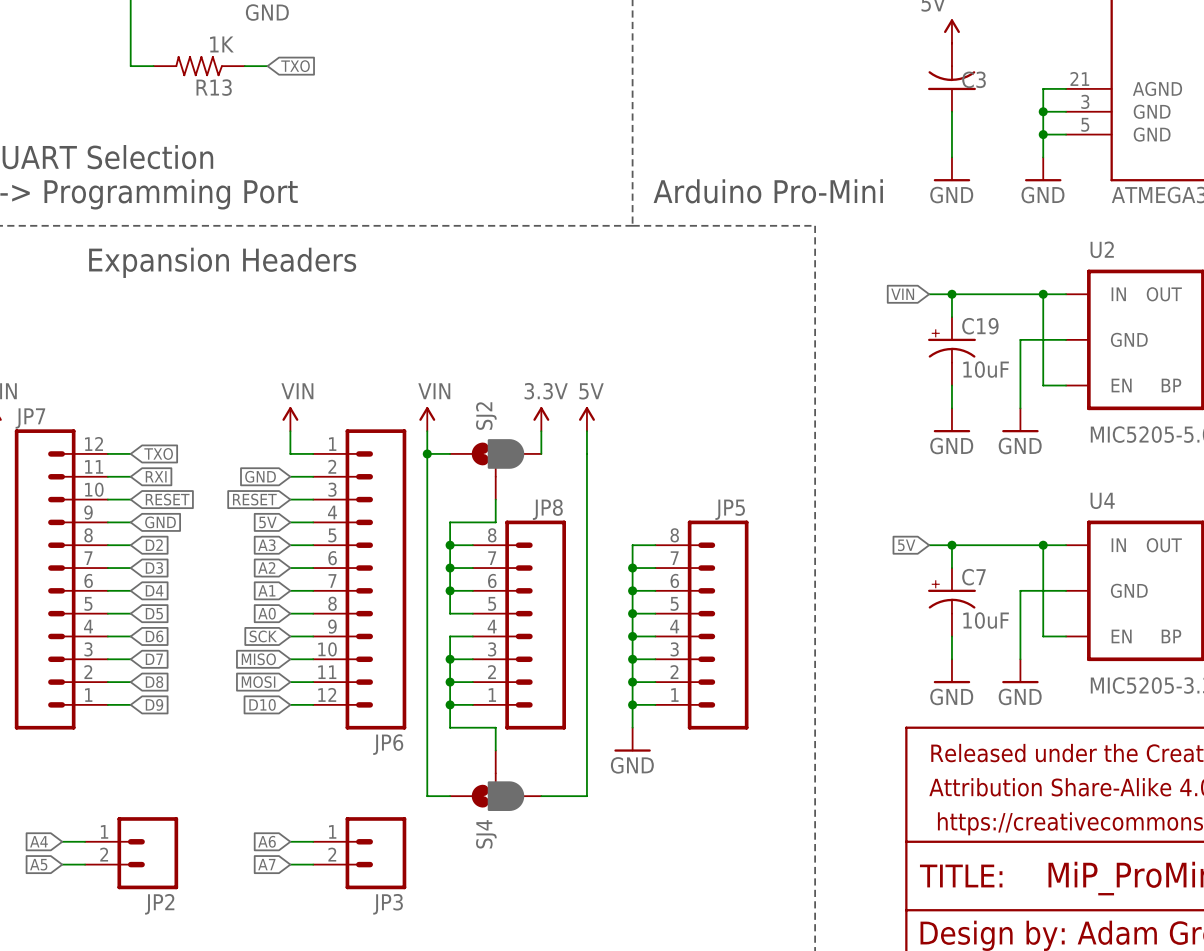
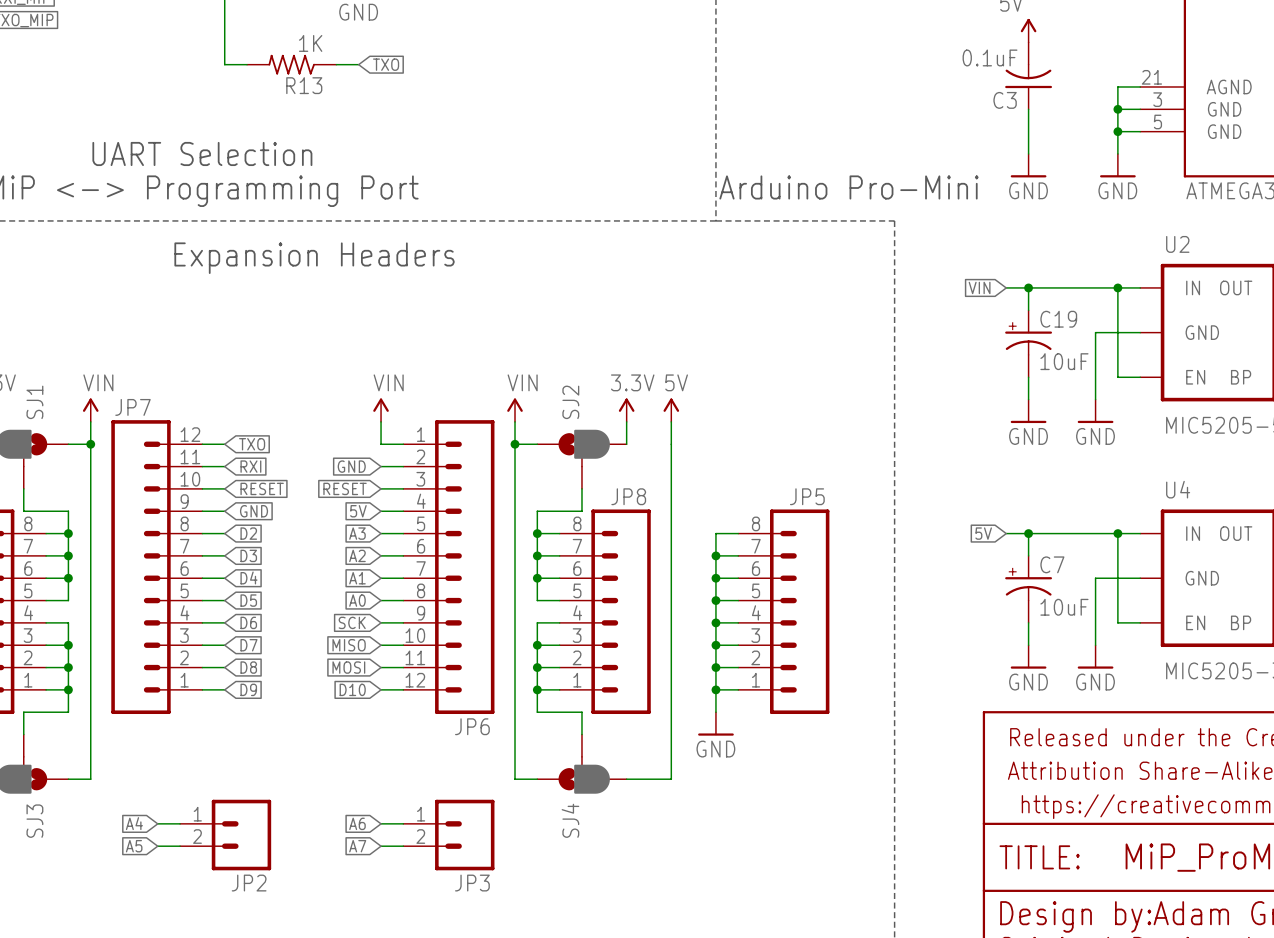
C3 value: none -> 0.1uF (990, 57)
C3 name position: C3 (974, 79) -> C3 (1005, 100)

